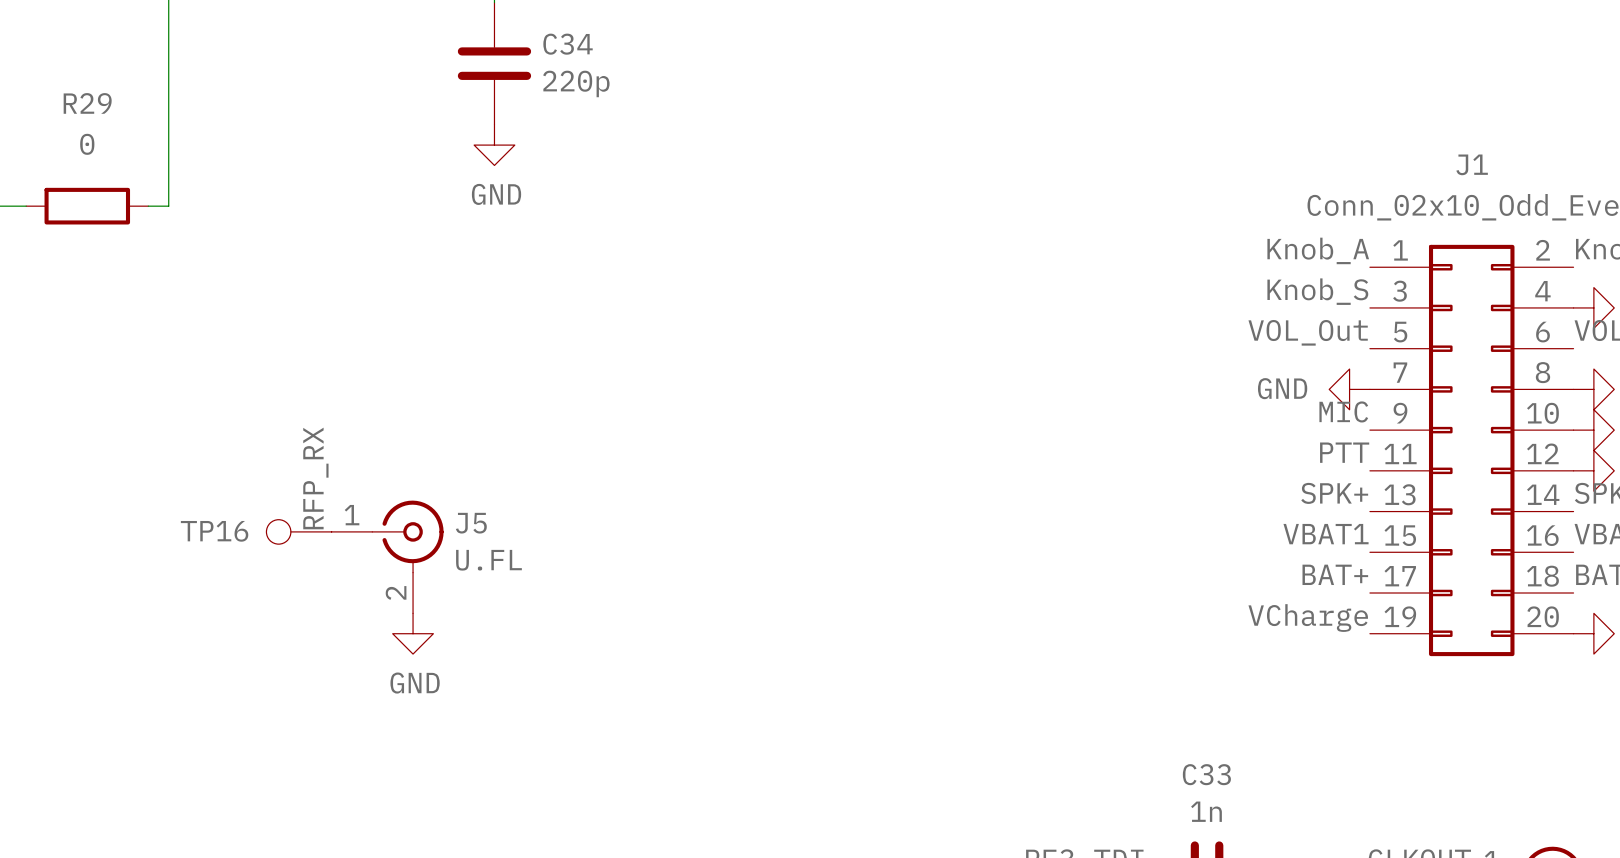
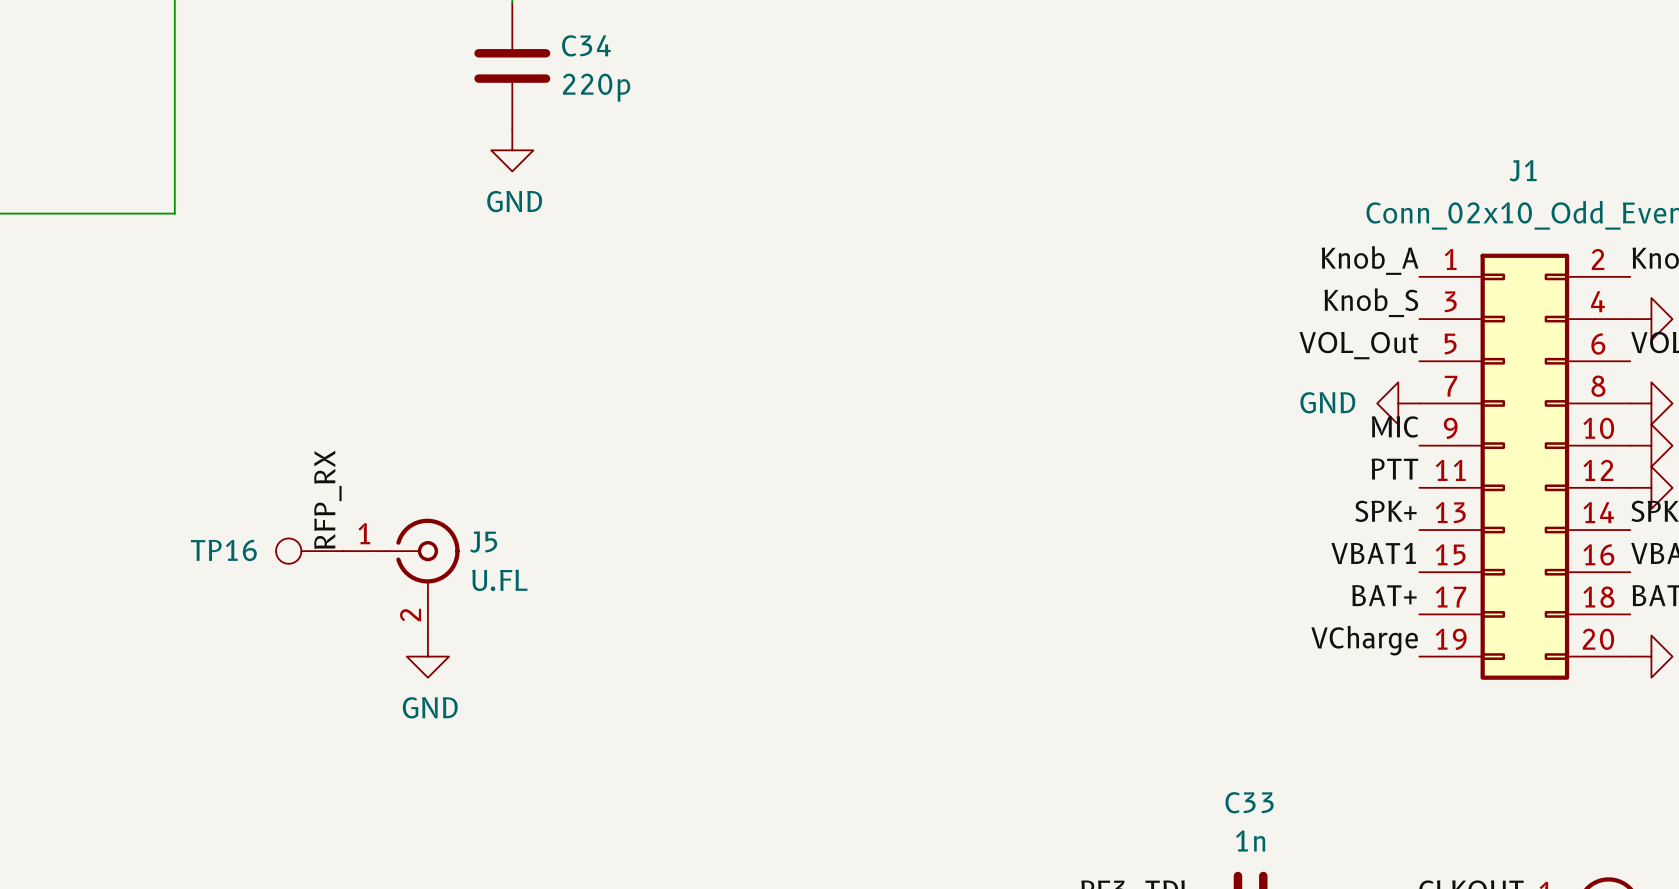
wire: none -> (27, 213) (153, 213)
R29: 0 (87, 206) -> none

